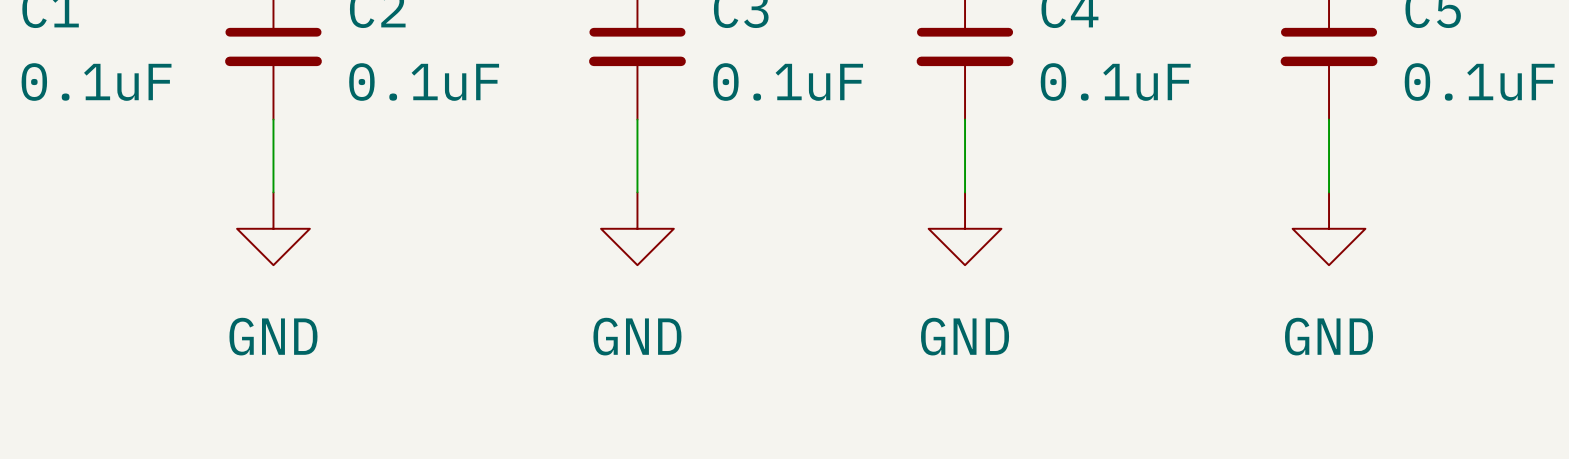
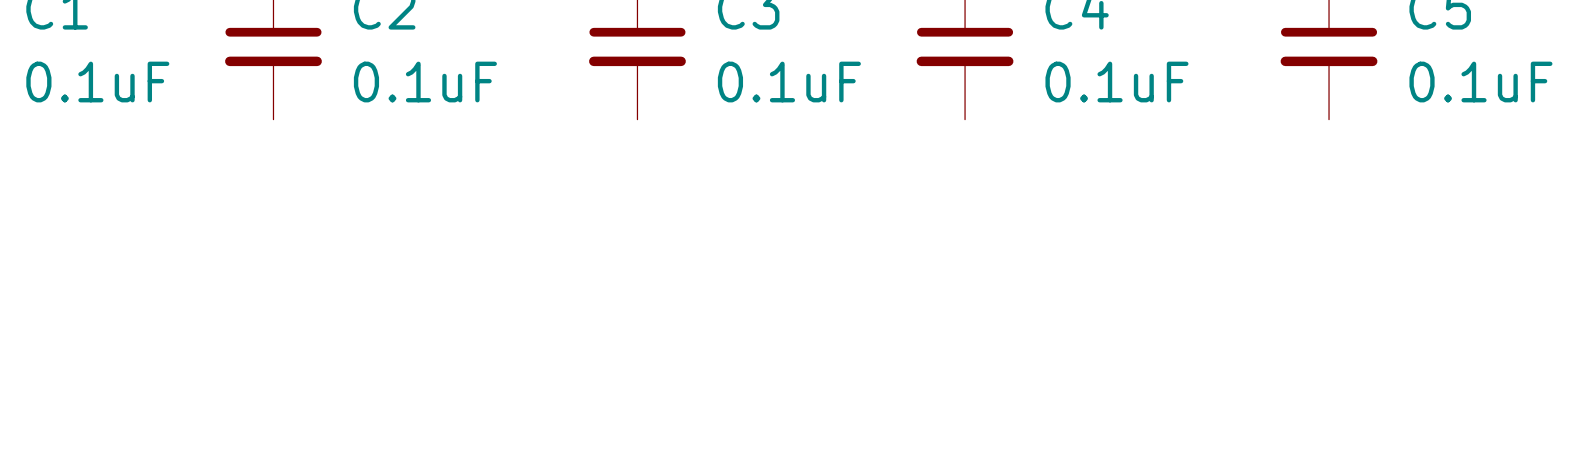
wire: (273, 119) (273, 192) -> none
wire: (637, 119) (637, 192) -> none
wire: (965, 119) (965, 192) -> none
wire: (1329, 119) (1329, 192) -> none
power symbol: GND (273, 228) -> none
power symbol: GND (637, 228) -> none
power symbol: GND (965, 228) -> none
power symbol: GND (1329, 228) -> none

